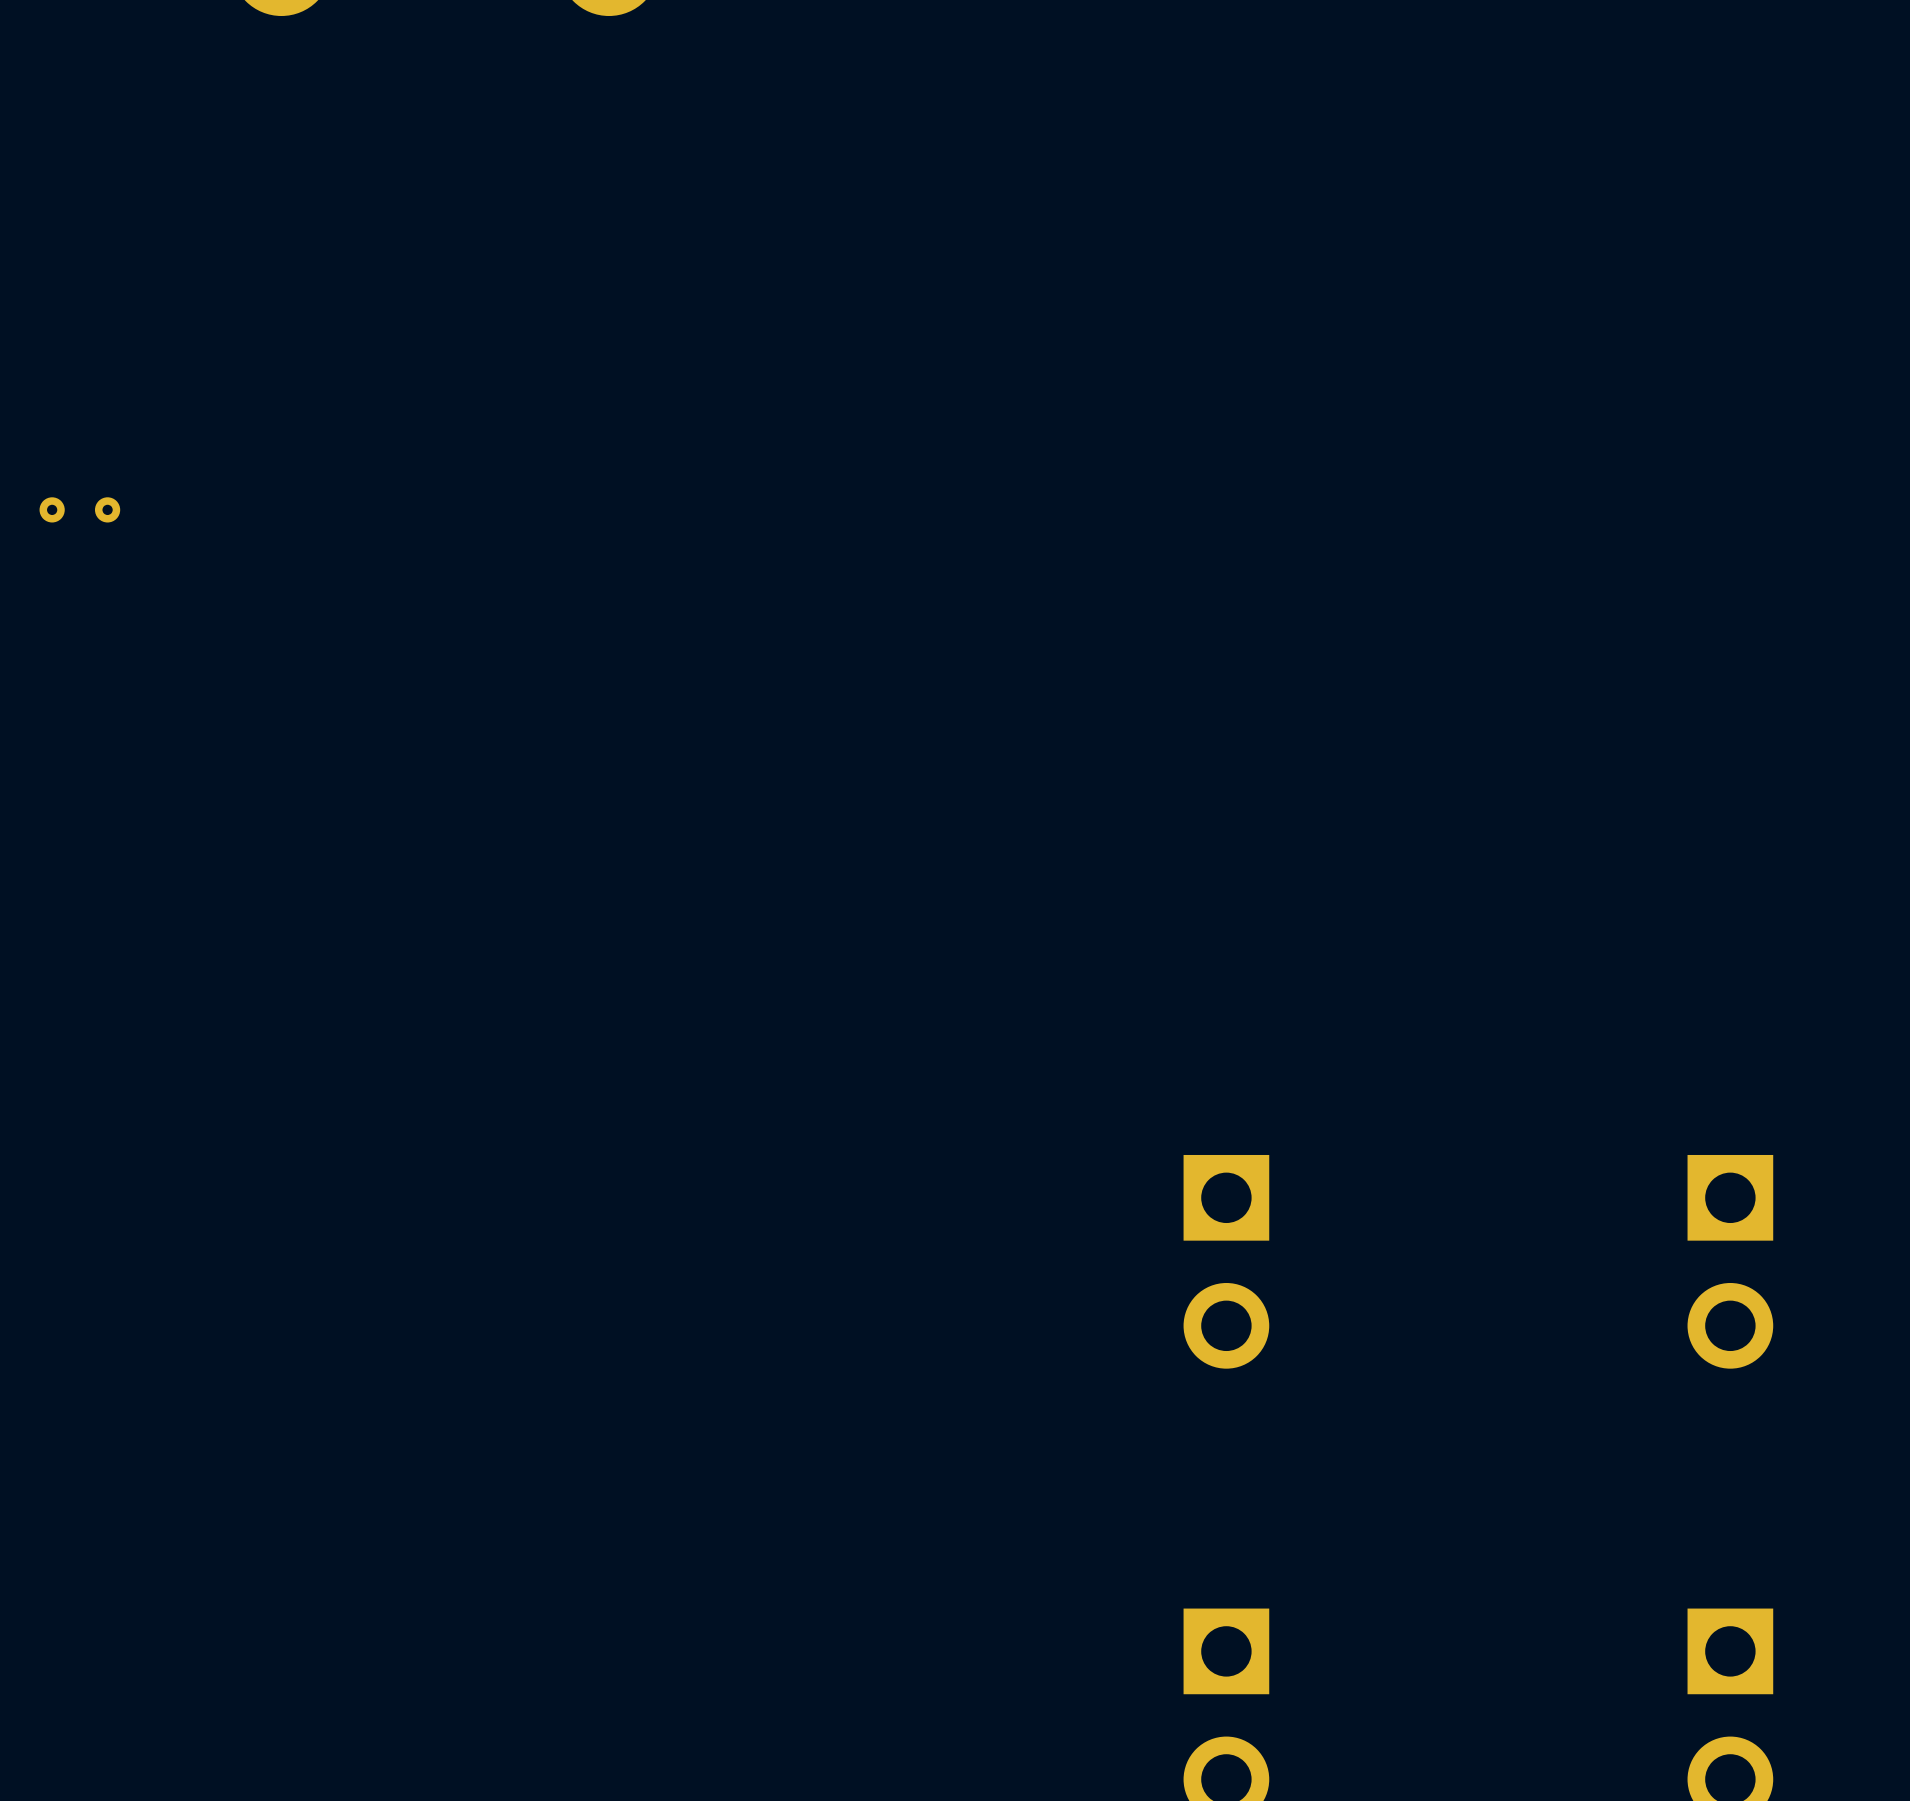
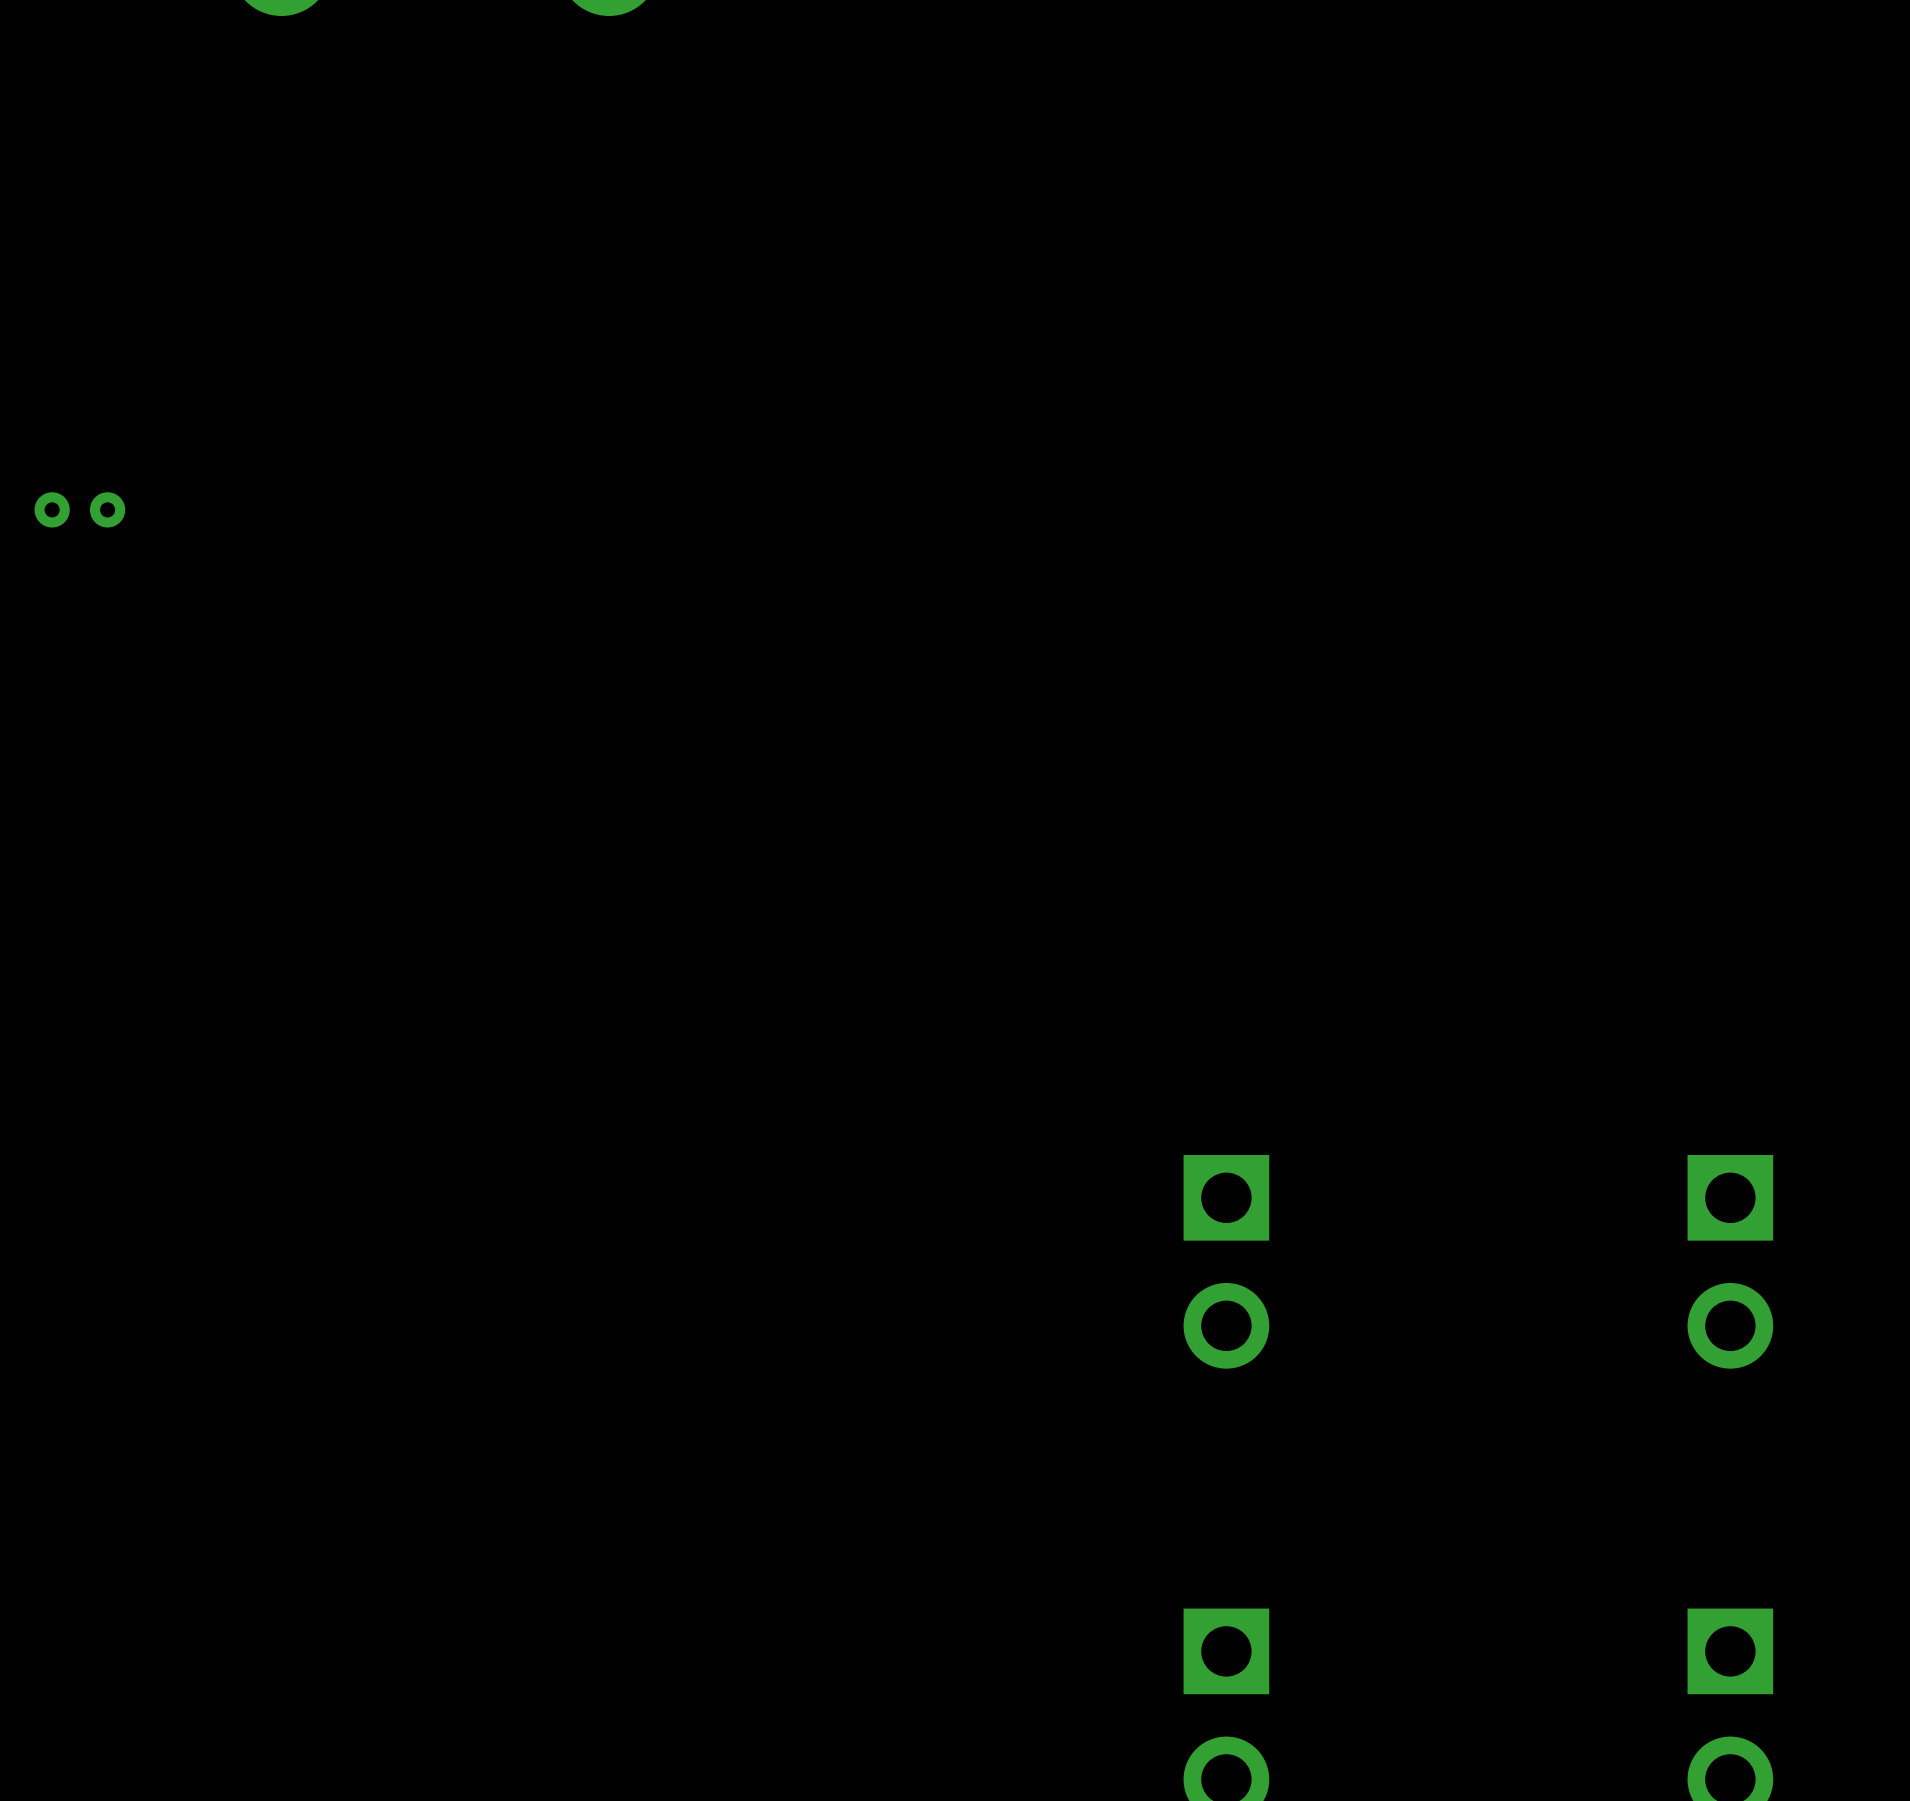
part footprint: [39, 497, 121, 523] -> [34, 492, 126, 528]

